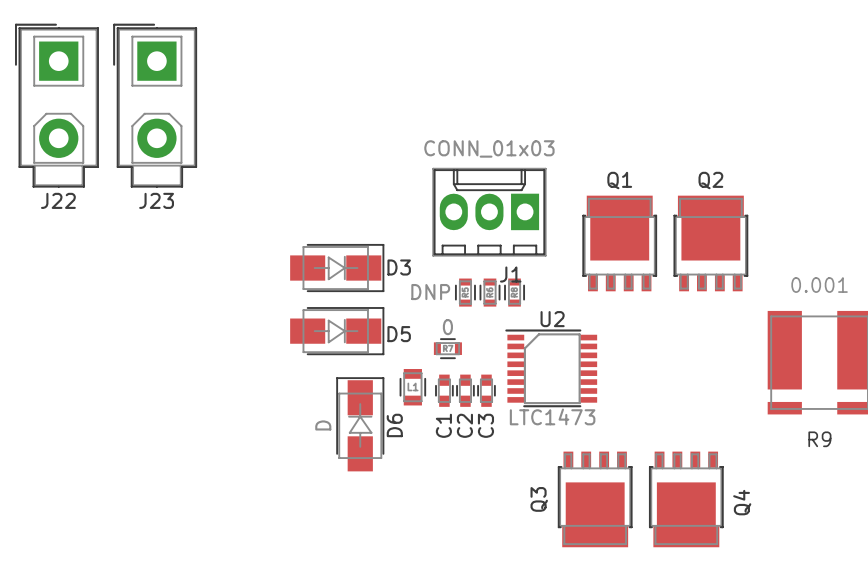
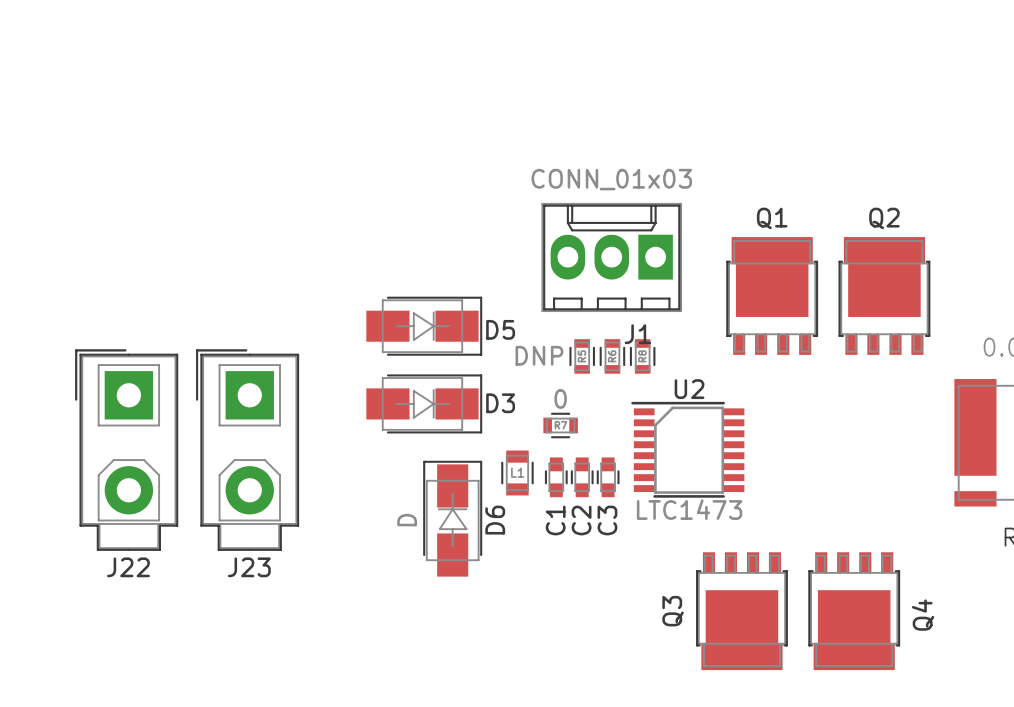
J22 position: (56, 105) -> (126, 450)
J23 position: (155, 105) -> (247, 450)
D3 name: D3 (399, 267) -> D5 (500, 329)
D5 name: D5 (399, 334) -> D3 (500, 403)

